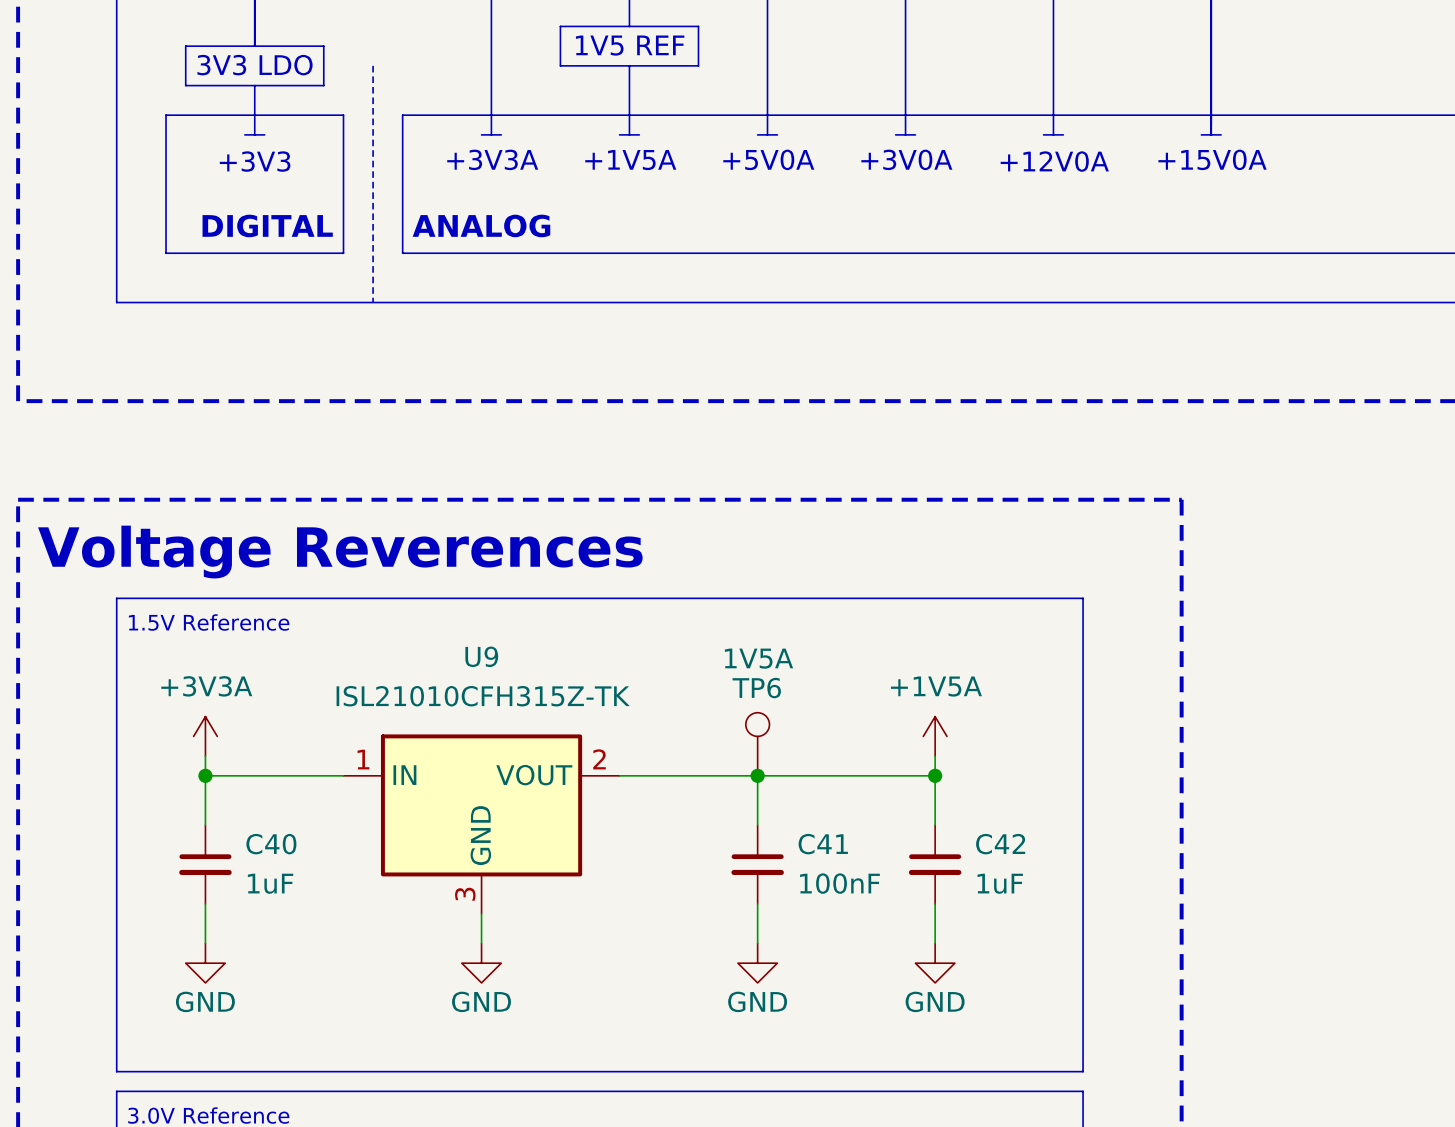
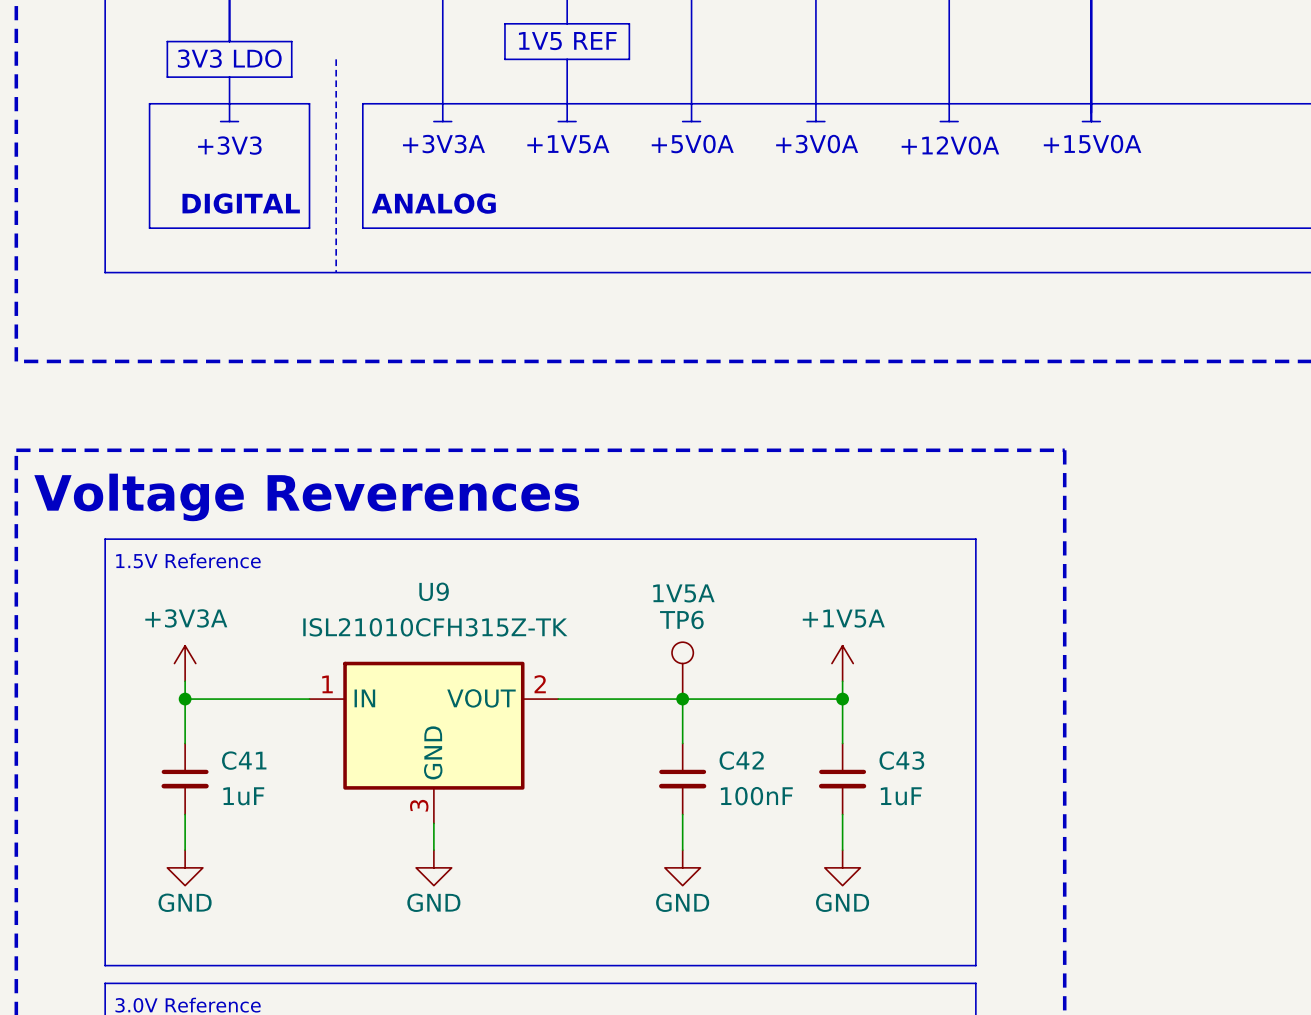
C40 name: C40 (271, 844) -> C41 (244, 760)
C41 name: C41 (823, 844) -> C42 (741, 760)
C42 name: C42 (1000, 844) -> C43 (901, 760)

